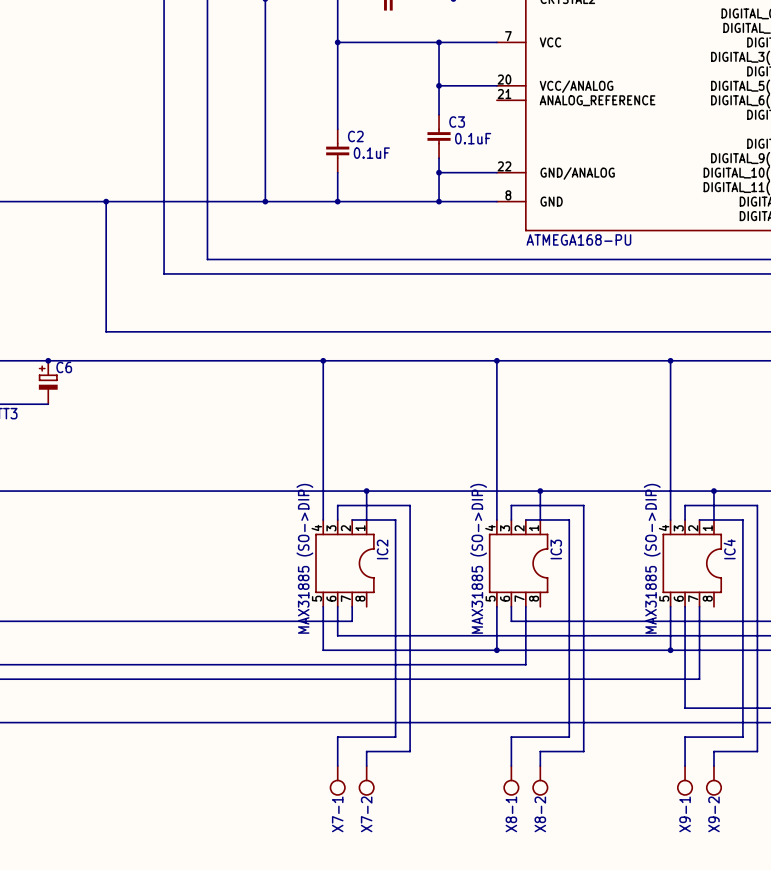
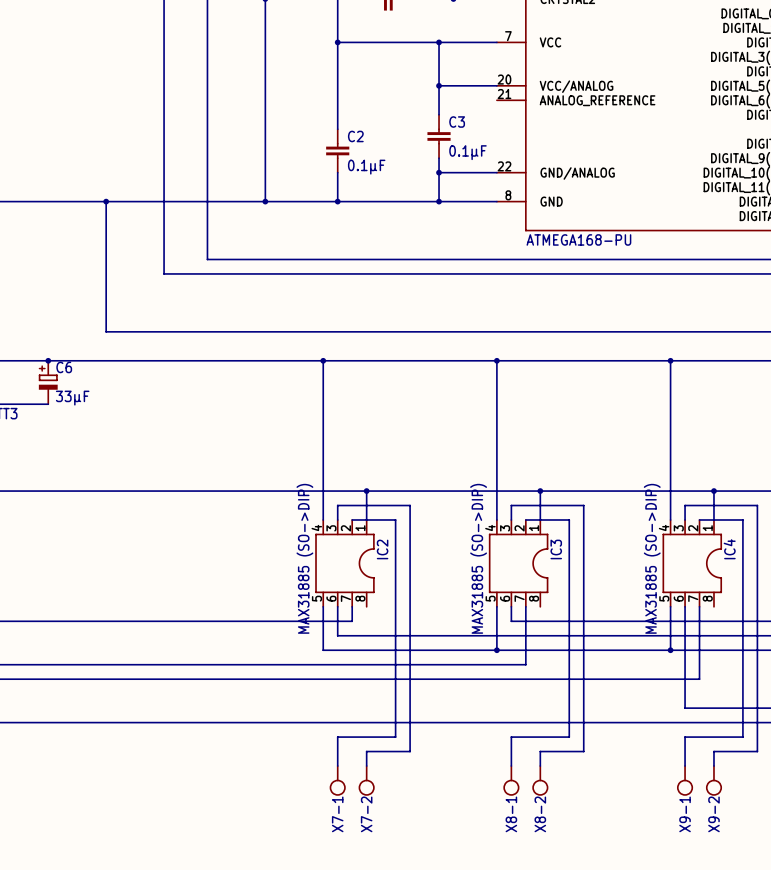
text: 0.1uF (473, 138) -> none
C3 value: none -> 0.1μF (467, 152)
text: 0.1uF (371, 153) -> none
C2 value: none -> 0.1μF (366, 167)
C6 value: none -> 33μF (72, 398)

